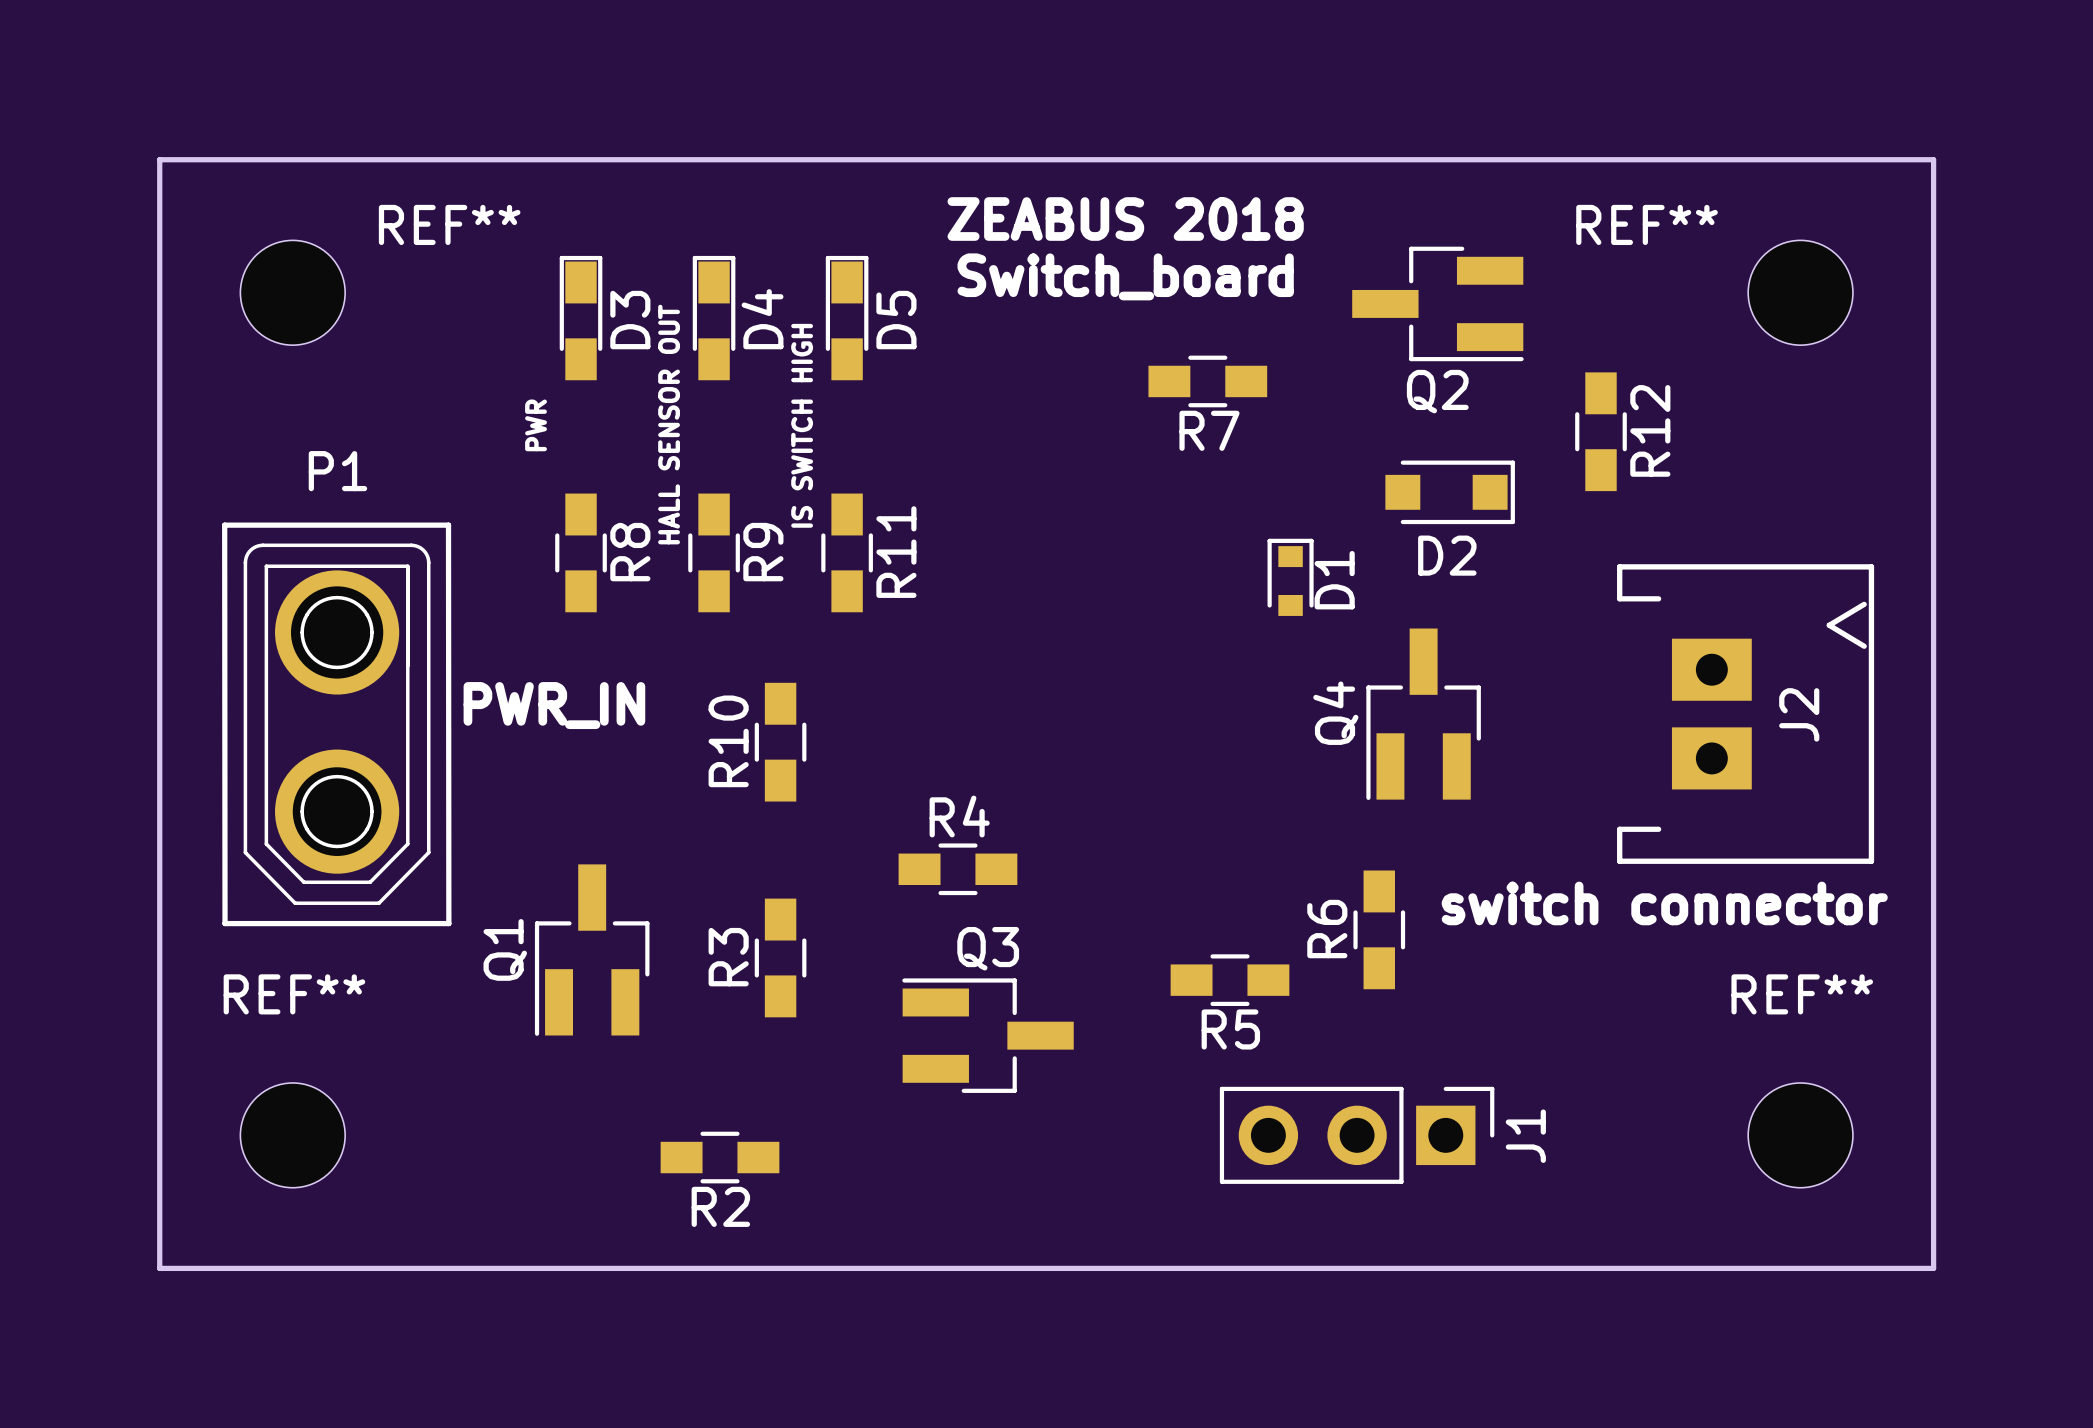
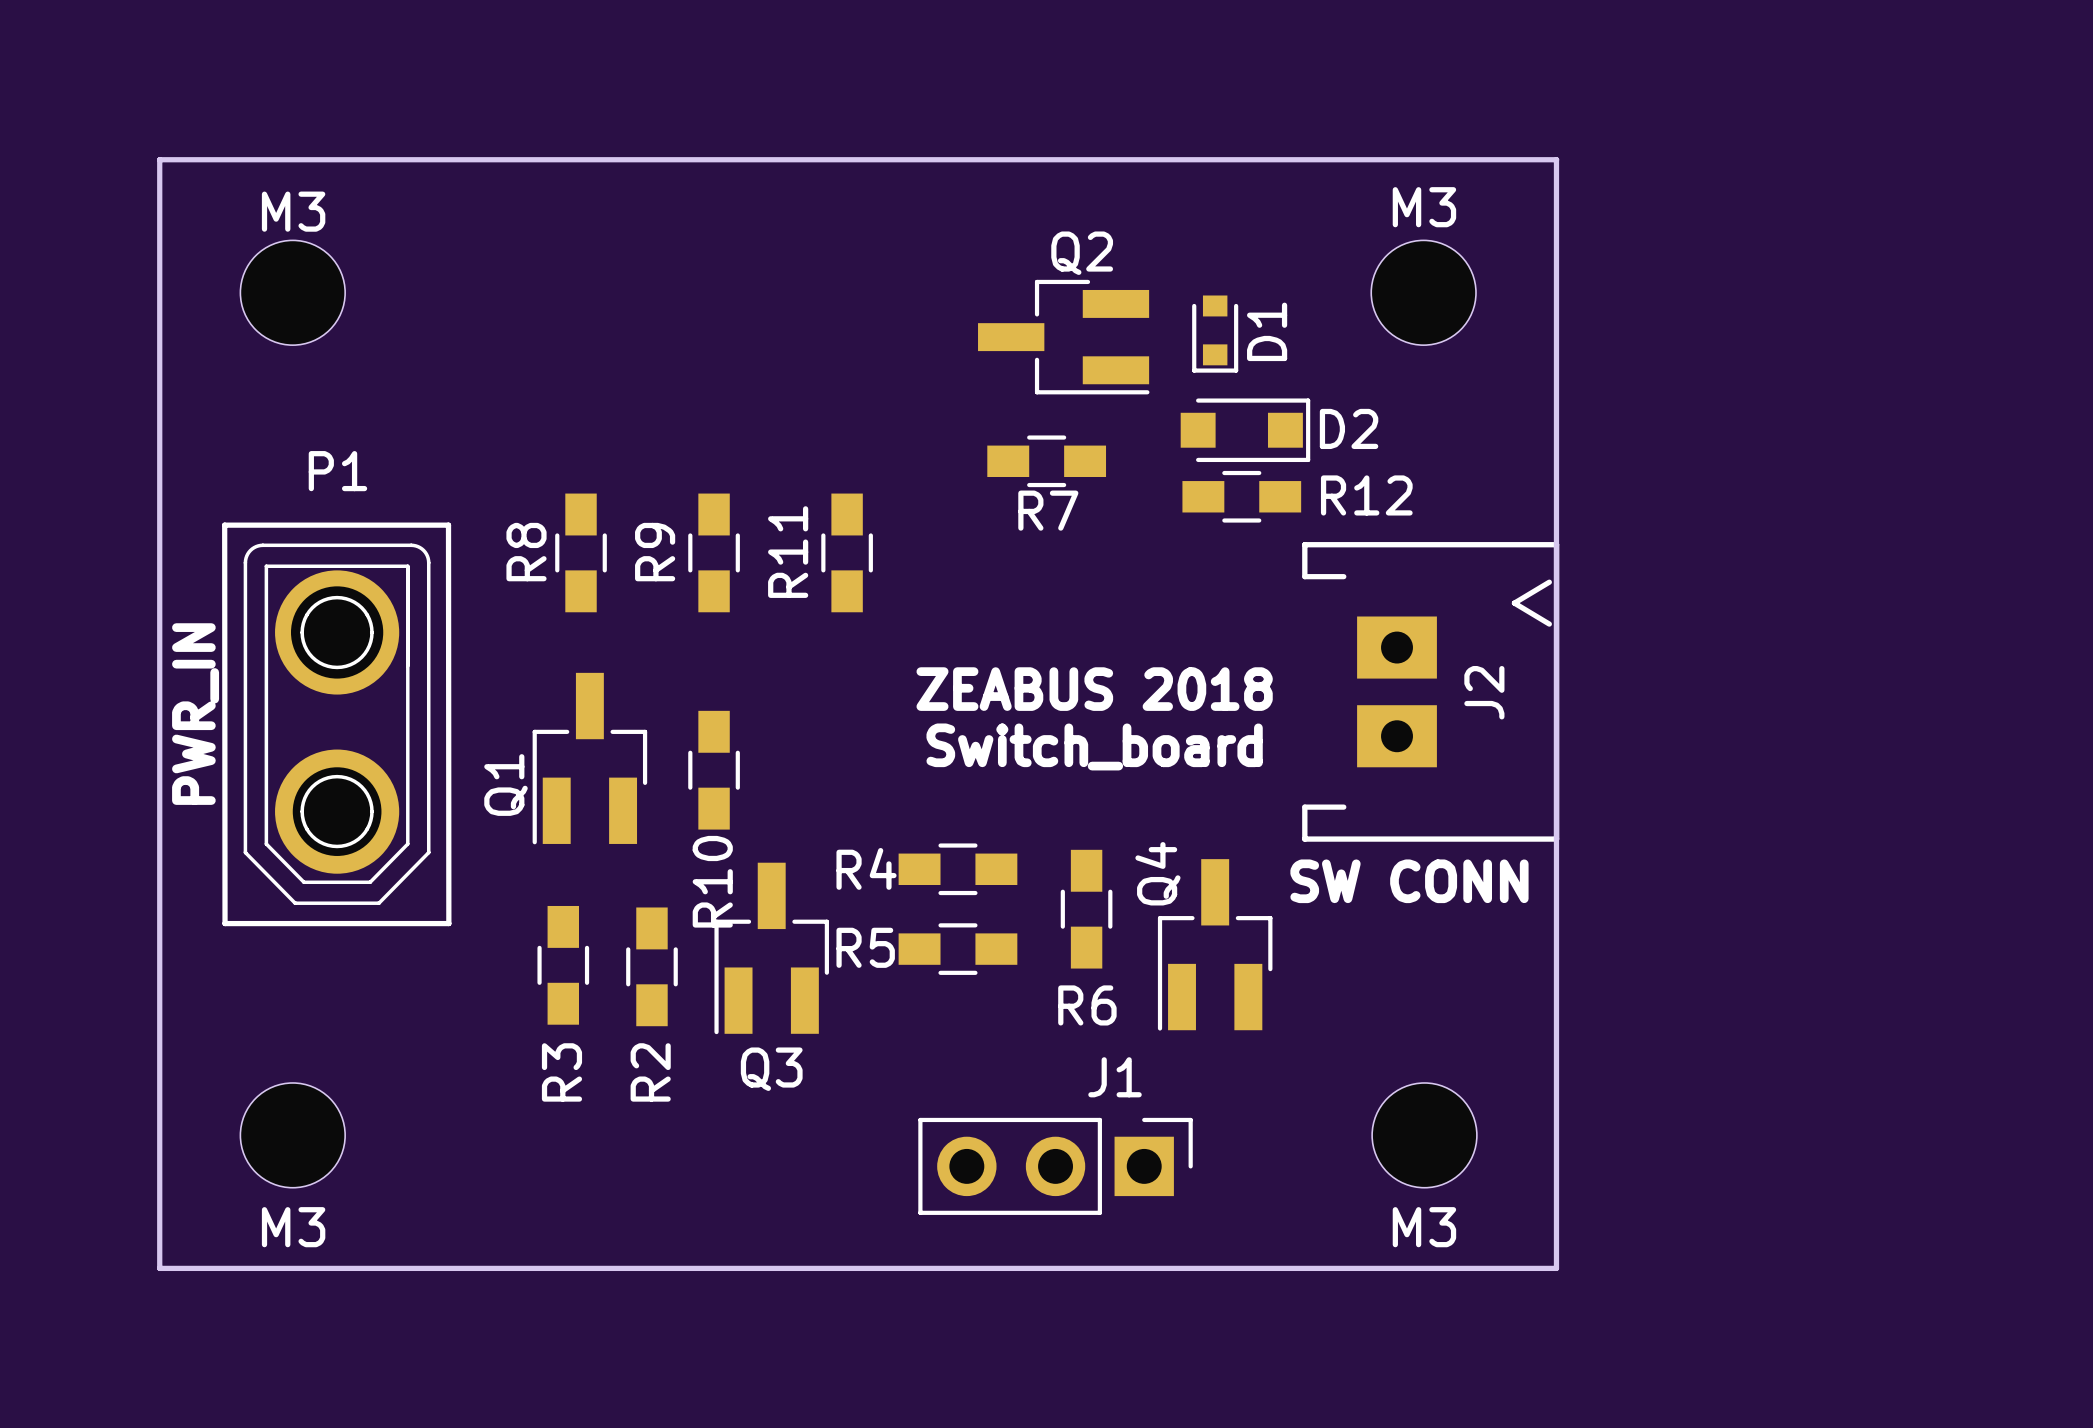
board edge: (1556, 159) (1933, 159) (1933, 1268) (1556, 1268) -> (1556, 159) (1556, 1268)
text position: ZEABUS 2018 (1125, 219) -> ZEABUS 2018 (1094, 689)
REF** name: REF** (449, 224) -> M3 (293, 211)
text position: Switch_board (1125, 276) -> Switch_board (1094, 746)
M3: none -> (1423, 292)
REF**: (1800, 292) -> none
Q2 position: (1437, 303) -> (1063, 337)
D3: (581, 318) -> none
D4: (714, 318) -> none
D5: (847, 318) -> none
R7 position: (1207, 381) -> (1046, 461)
Q2 name position: Q2 (1437, 391) -> Q2 (1082, 253)
text: HALL SENSOR OUT (669, 424) -> none
text: PWR (536, 425) -> none
text: IS SWITCH HIGH (802, 425) -> none
R12 name position: R12 (1650, 430) -> R12 (1366, 495)
R12 rotation: 0° (1601, 431) -> 90° clockwise (1241, 496)
R12 position: (1601, 431) -> (1241, 496)
D2 position: (1450, 492) -> (1245, 430)
R8 name position: R8 (630, 552) -> R8 (526, 552)
R9 name position: R9 (763, 552) -> R9 (655, 552)
R11 name position: R11 (896, 552) -> R11 (788, 552)
D2 name position: D2 (1447, 555) -> D2 (1349, 428)
D1 rotation: 0° (1290, 577) -> 180° (1215, 334)
D1 position: (1290, 577) -> (1215, 334)
text rotation: 0° (554, 705) -> 90° counterclockwise (195, 714)
text position: PWR_IN (554, 705) -> PWR_IN (195, 714)
Q4 name position: Q4 (1335, 713) -> Q4 (1157, 873)
Q4 position: (1423, 714) -> (1215, 944)
J2 position: (1745, 714) -> (1430, 691)
R10 name position: R10 (728, 741) -> R10 (712, 881)
R10 position: (780, 742) -> (714, 770)
R4 name position: R4 (959, 816) -> R4 (866, 868)
text: none -> SW CONN (1409, 881)
text: switch connector (1664, 903) -> none
R6 name rotation: 0° (1327, 929) -> 90° clockwise (1087, 1005)
R6 name position: R6 (1327, 929) -> R6 (1087, 1005)
R6 position: (1379, 929) -> (1086, 909)
Q3 name position: Q3 (988, 948) -> Q3 (771, 1069)
Q1 name position: Q1 (505, 949) -> Q1 (505, 785)
Q1 position: (592, 950) -> (589, 758)
R3 name position: R3 (728, 957) -> R3 (561, 1072)
R3 position: (780, 957) -> (563, 965)
R5 position: (1229, 980) -> (957, 949)
REF** name: REF** (294, 994) -> M3 (293, 1227)
R5 name position: R5 (1230, 1029) -> R5 (865, 947)
Q3 rotation: 0° (988, 1035) -> 90° counterclockwise (771, 948)
Q3 position: (988, 1035) -> (771, 948)
J1 position: (1357, 1135) -> (1055, 1166)
M3: none -> (1424, 1135)
REF**: (1800, 1135) -> none
J1 name rotation: 0° (1525, 1136) -> 90° clockwise (1115, 1077)
J1 name position: J1 (1525, 1136) -> J1 (1115, 1077)
R2 rotation: 0° (720, 1157) -> 90° clockwise (651, 966)
R2 position: (720, 1157) -> (651, 966)

